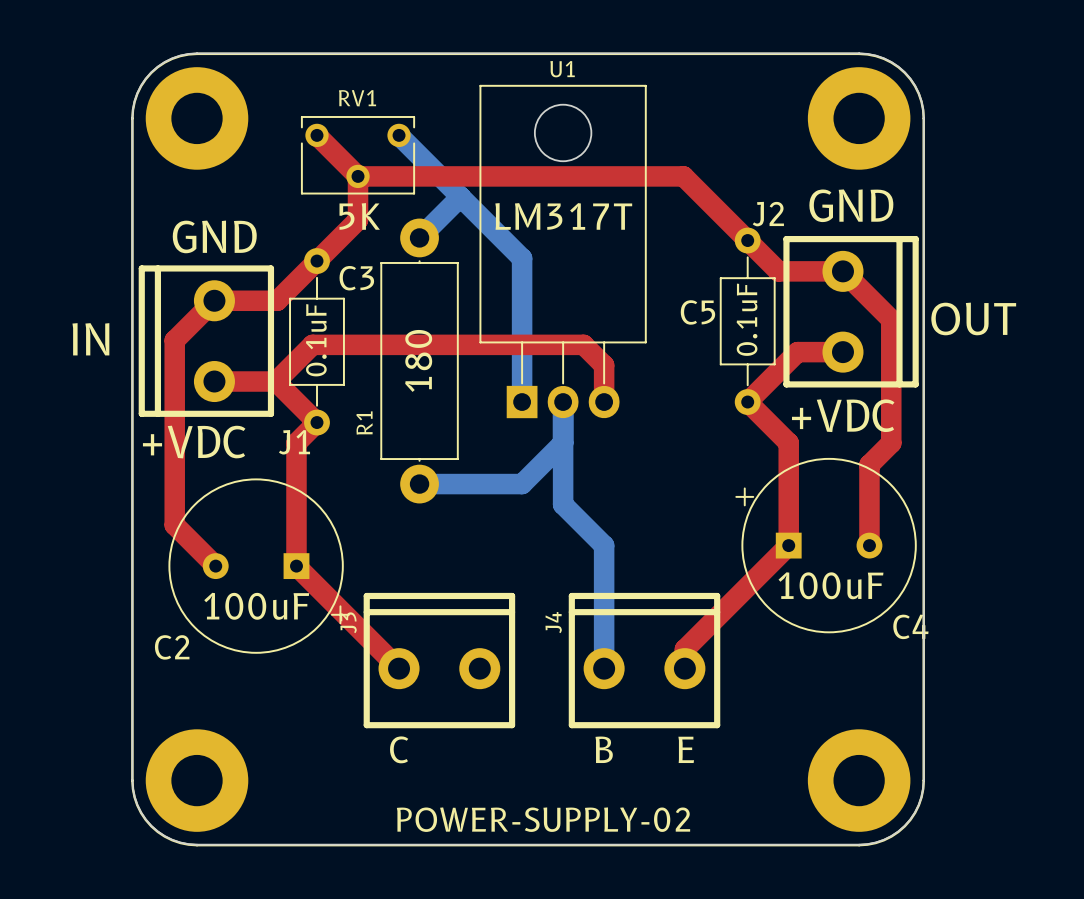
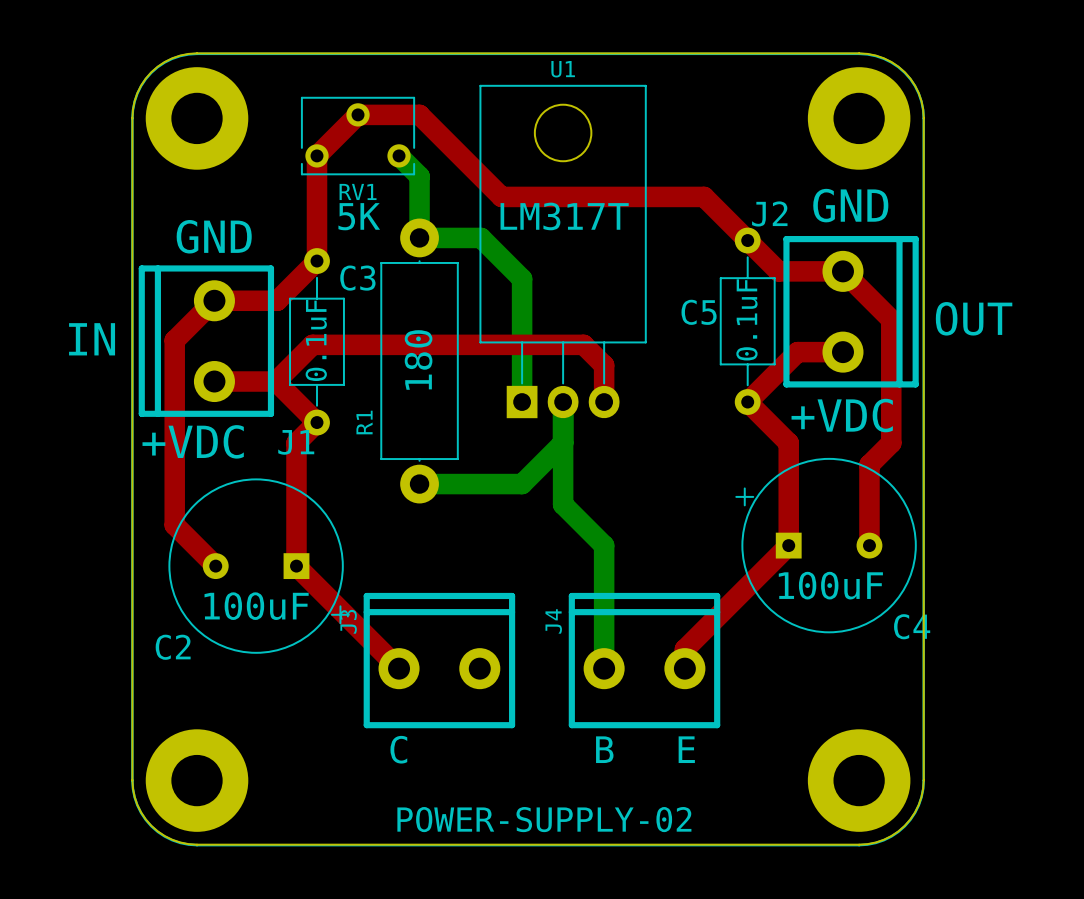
top track: (317, 135) (358, 176) -> none
bottom track: (399, 135) (522, 258) (522, 278) -> (399, 155) (419, 176) (419, 237) (481, 237) (522, 278)
RV1 rotation: 0° (358, 155) -> 180° (358, 136)
top track: (358, 176) (683, 176) (704, 196) -> (317, 261) (317, 155) (358, 114) (419, 114) (501, 196) (704, 196)
top track: (358, 176) (358, 220) (317, 261) -> none
bottom track: (460, 196) (419, 237) -> none

